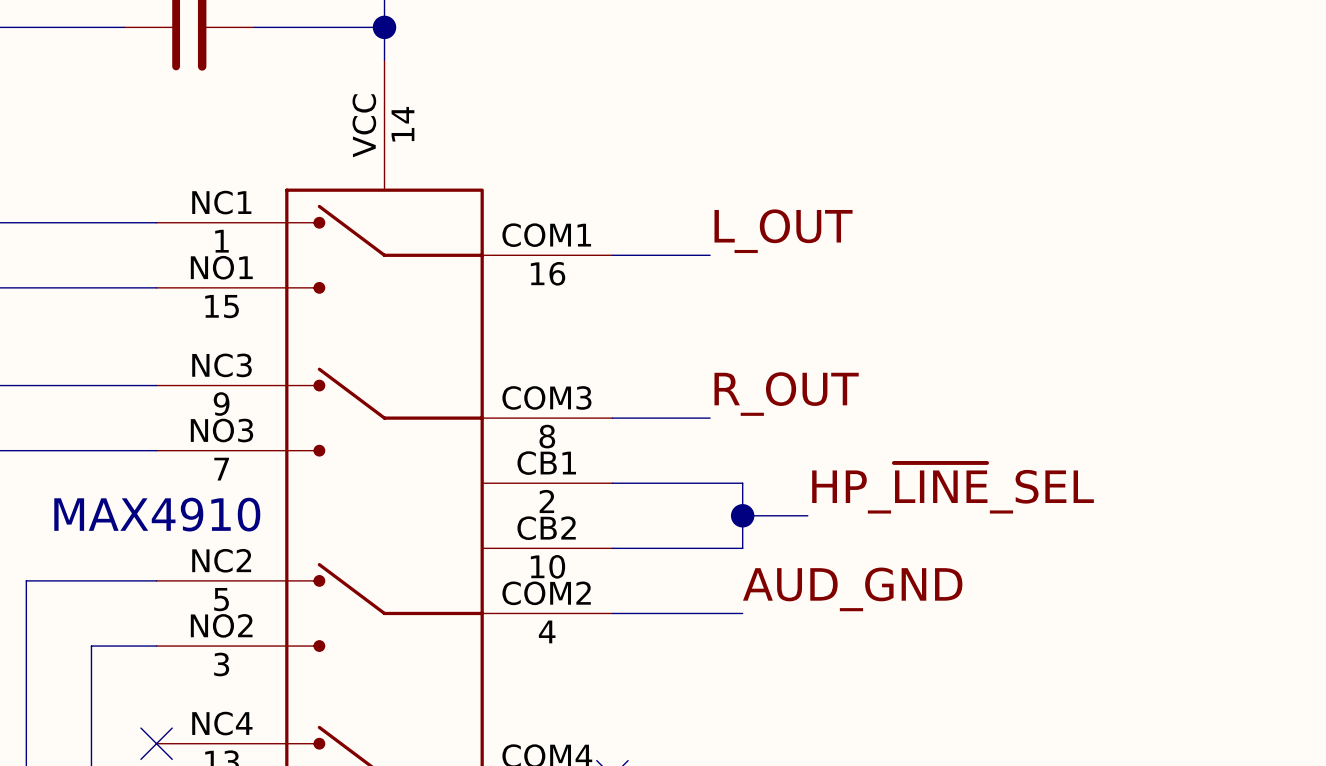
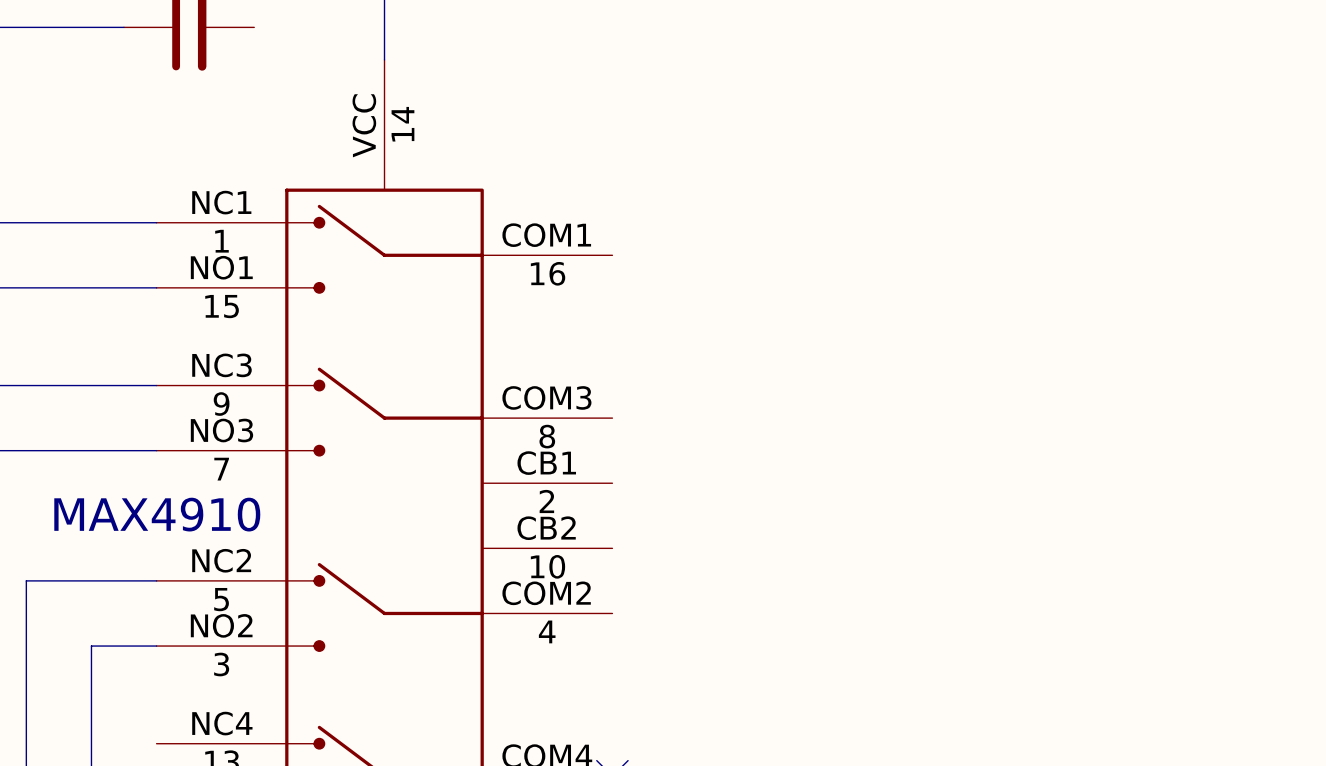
wire: (254, 27) (384, 27) -> none
junction: (384, 27) -> none
label: L_OUT (783, 231) -> none
wire: (612, 255) (710, 255) -> none
label: R_OUT (786, 394) -> none
wire: (612, 418) (710, 418) -> none
wire: (612, 483) (742, 483) (742, 548) (612, 548) -> none
label: HP_~{LINE}_SEL (953, 488) -> none
wire: (742, 515) (807, 515) -> none
junction: (742, 515) -> none
label: AUD_GND (852, 589) -> none
wire: (612, 613) (742, 613) -> none
no-connect mark: (156, 743) -> none

